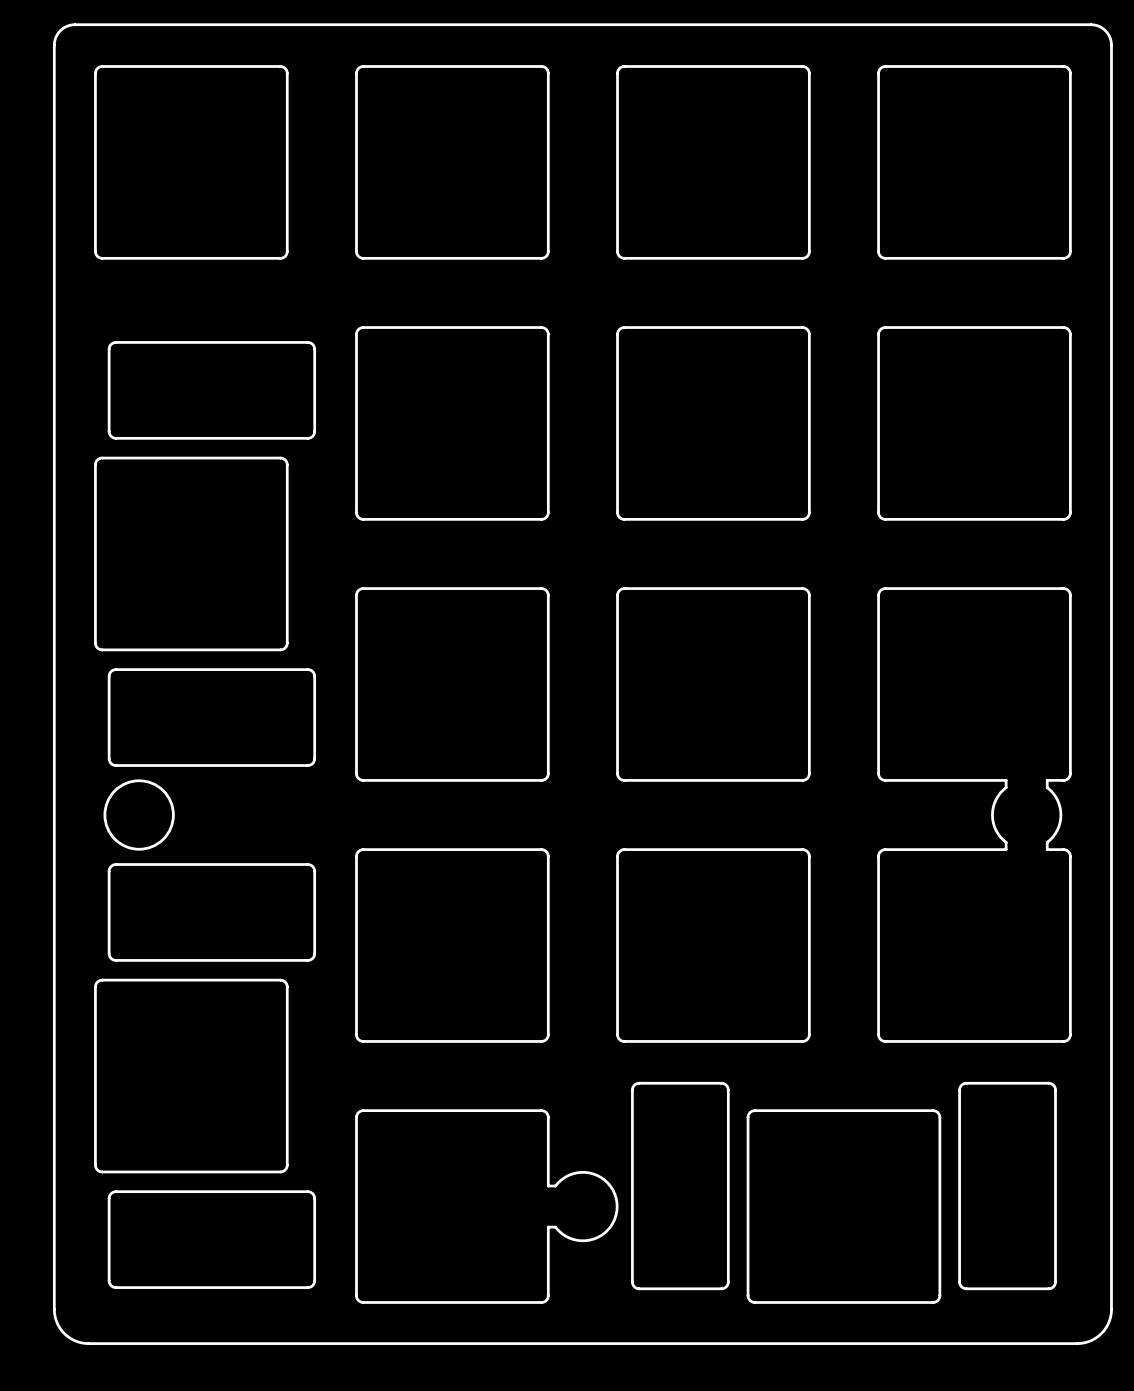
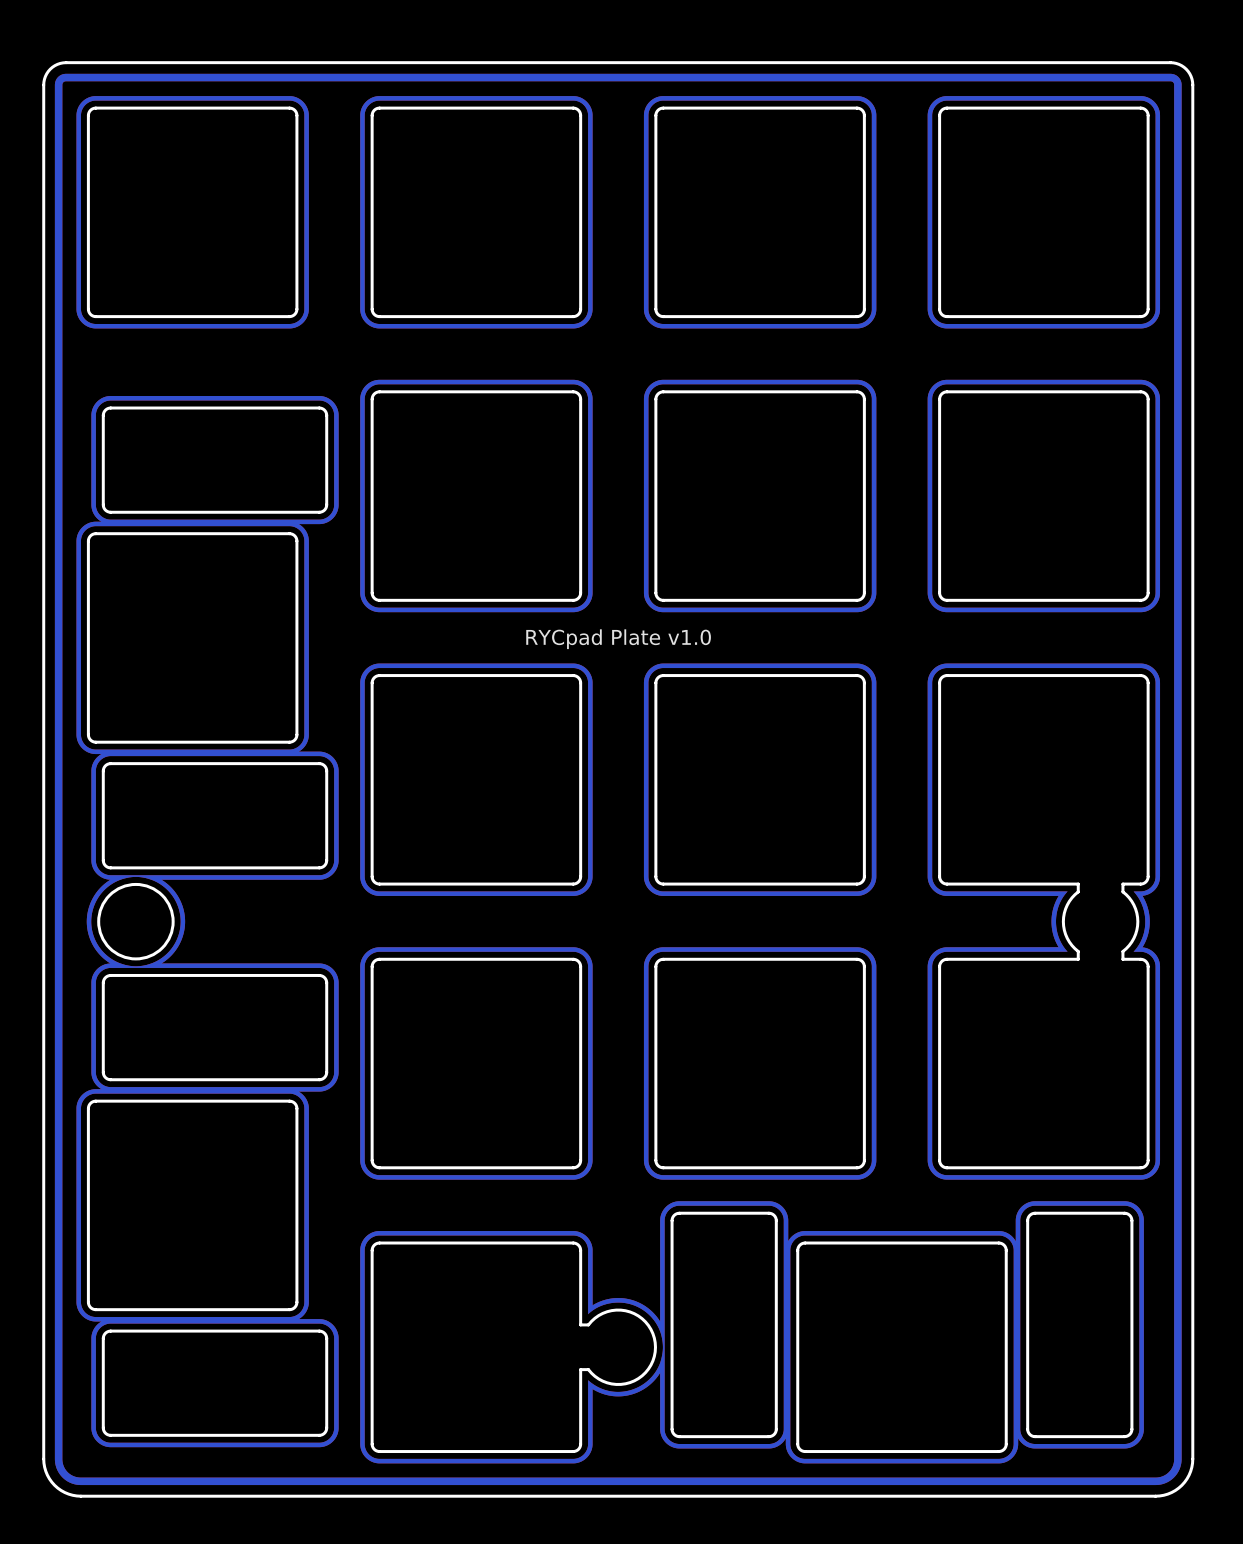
drawing: none -> [54, 73, 1182, 1486]
text: none -> RYCpad Plate v1.0 (618, 639)

